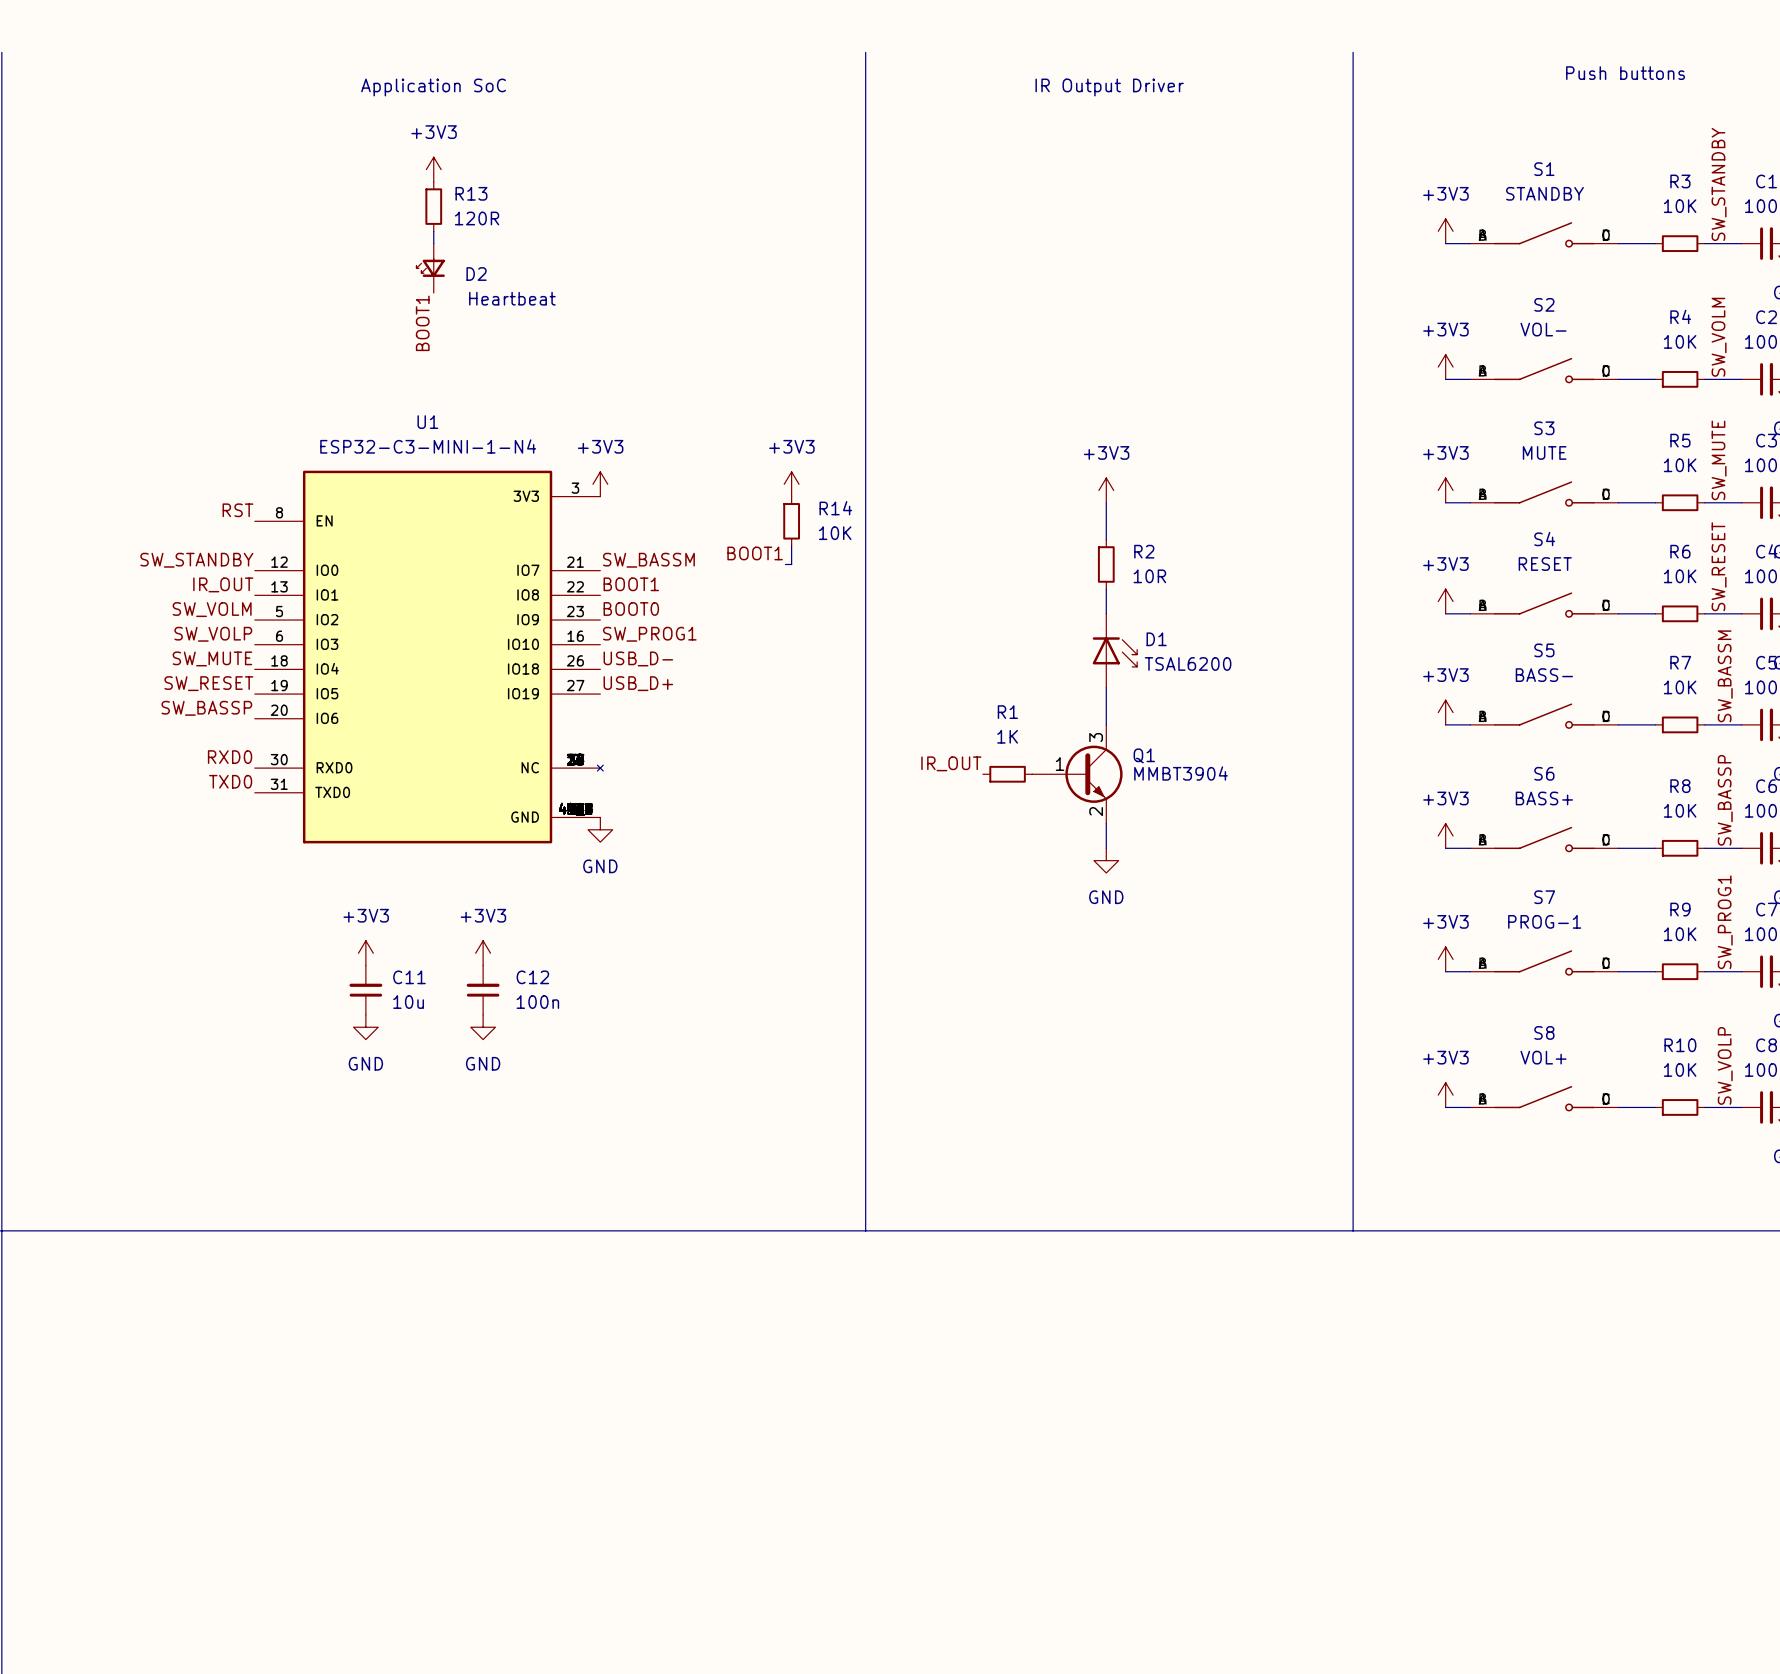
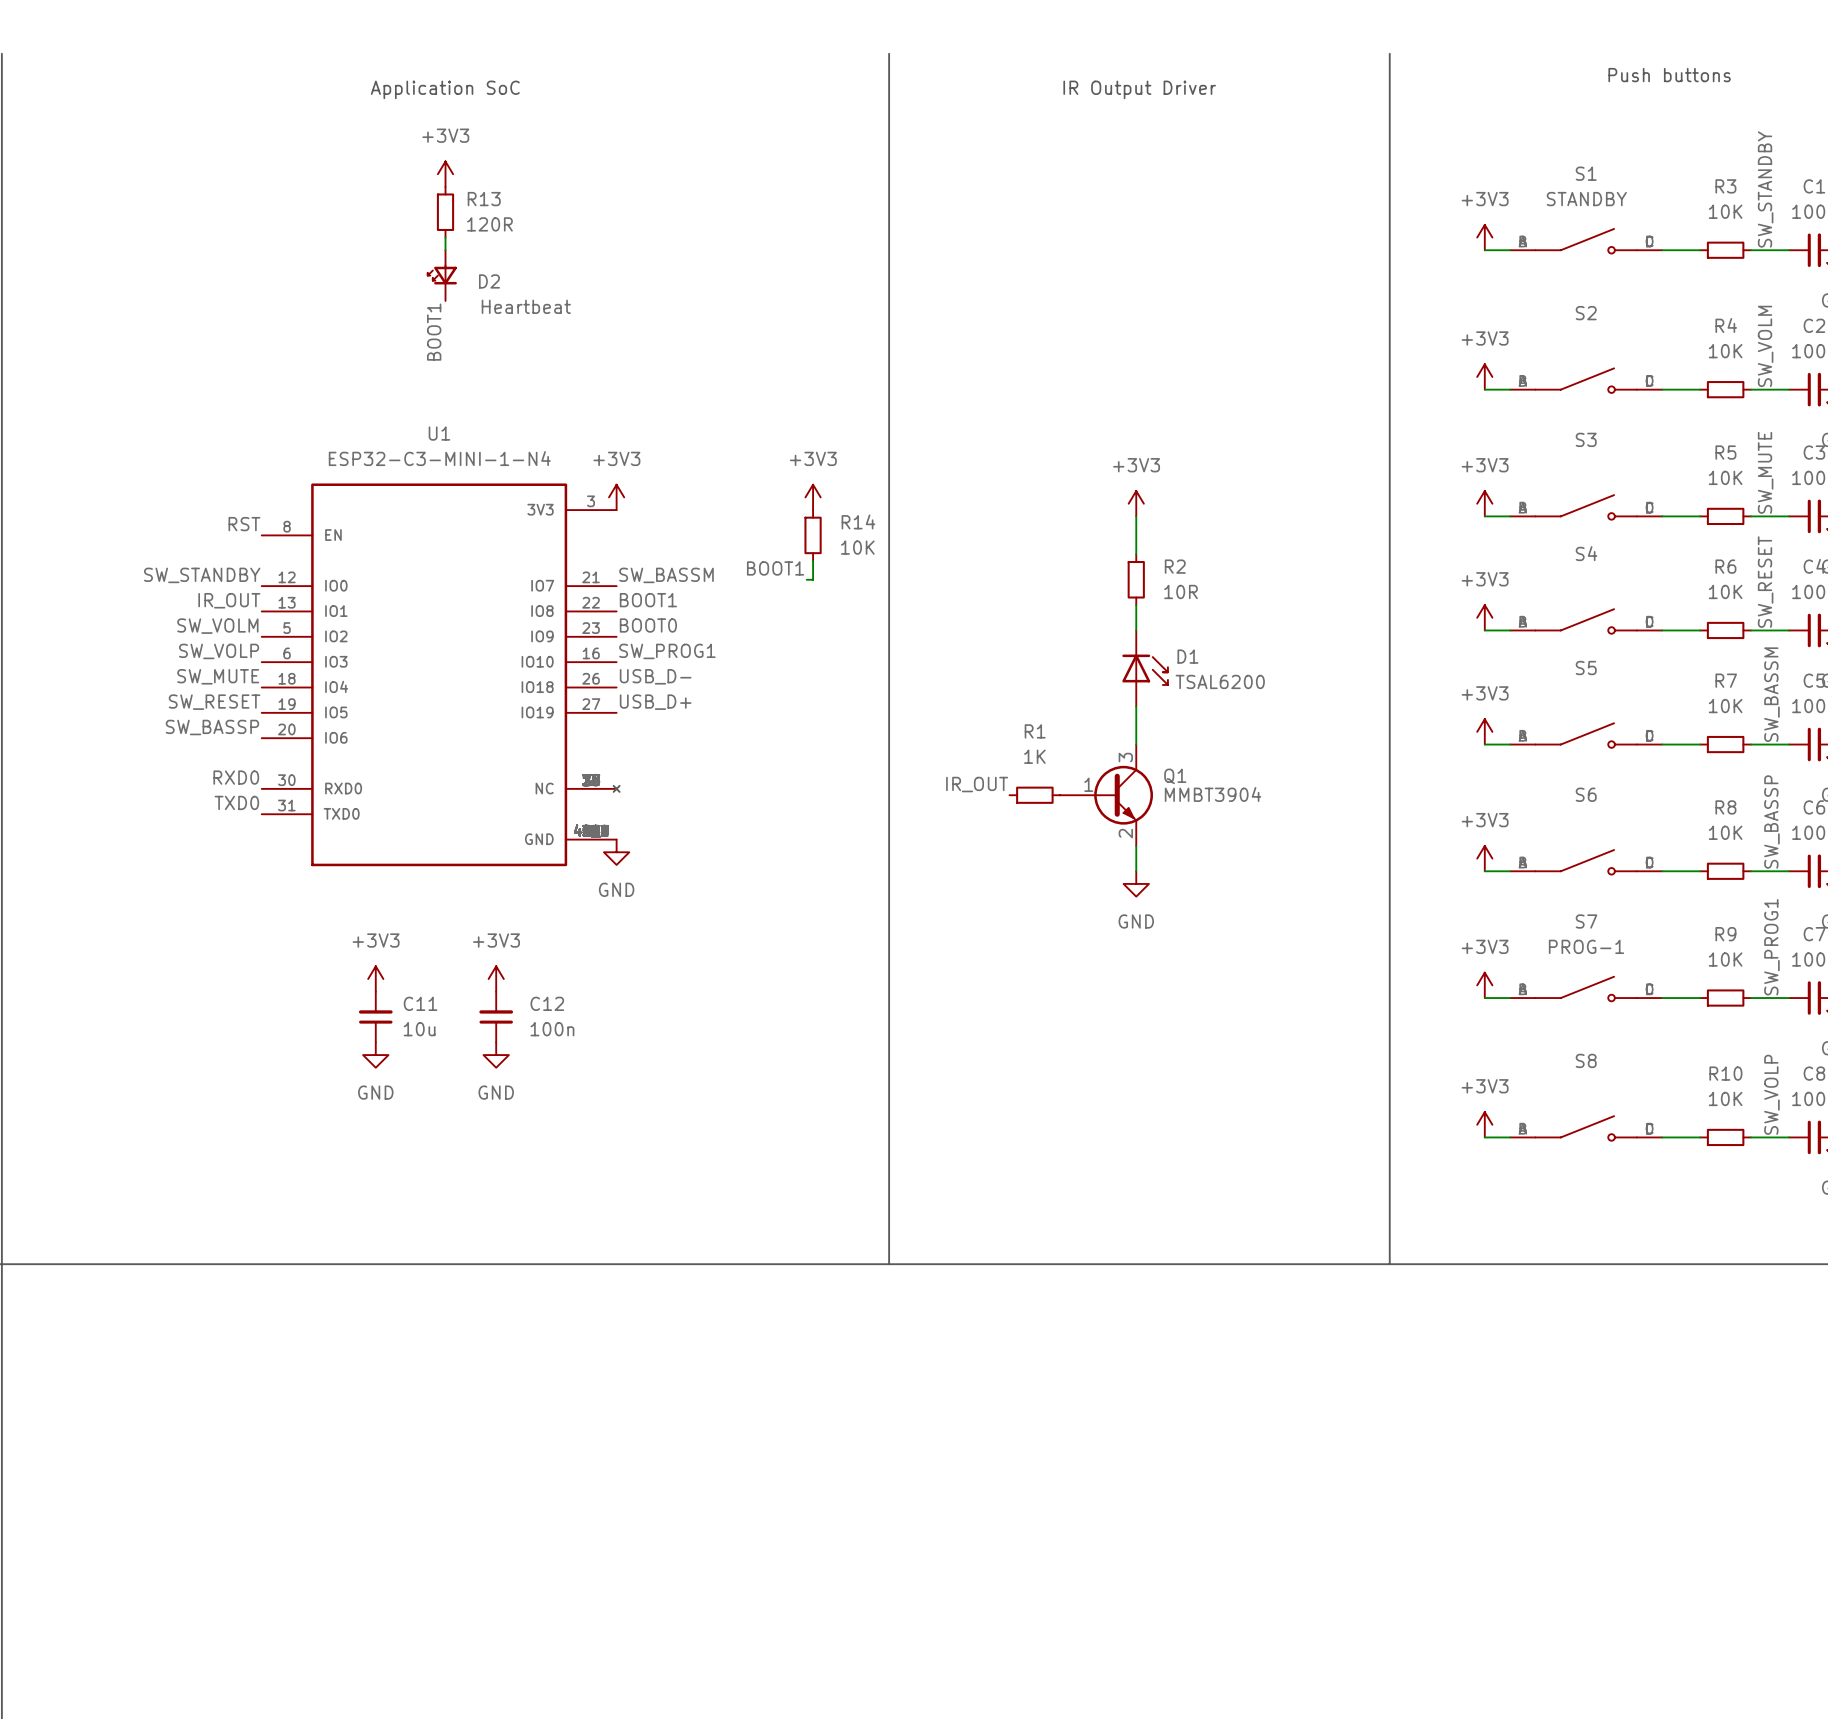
S2 value: VOL- (1543, 329) -> none
S3 value: MUTE (1544, 452) -> none
S4 value: RESET (1545, 564) -> none
S5 value: BASS- (1544, 675) -> none
S6 value: BASS+ (1544, 798) -> none
S8 value: VOL+ (1543, 1057) -> none

